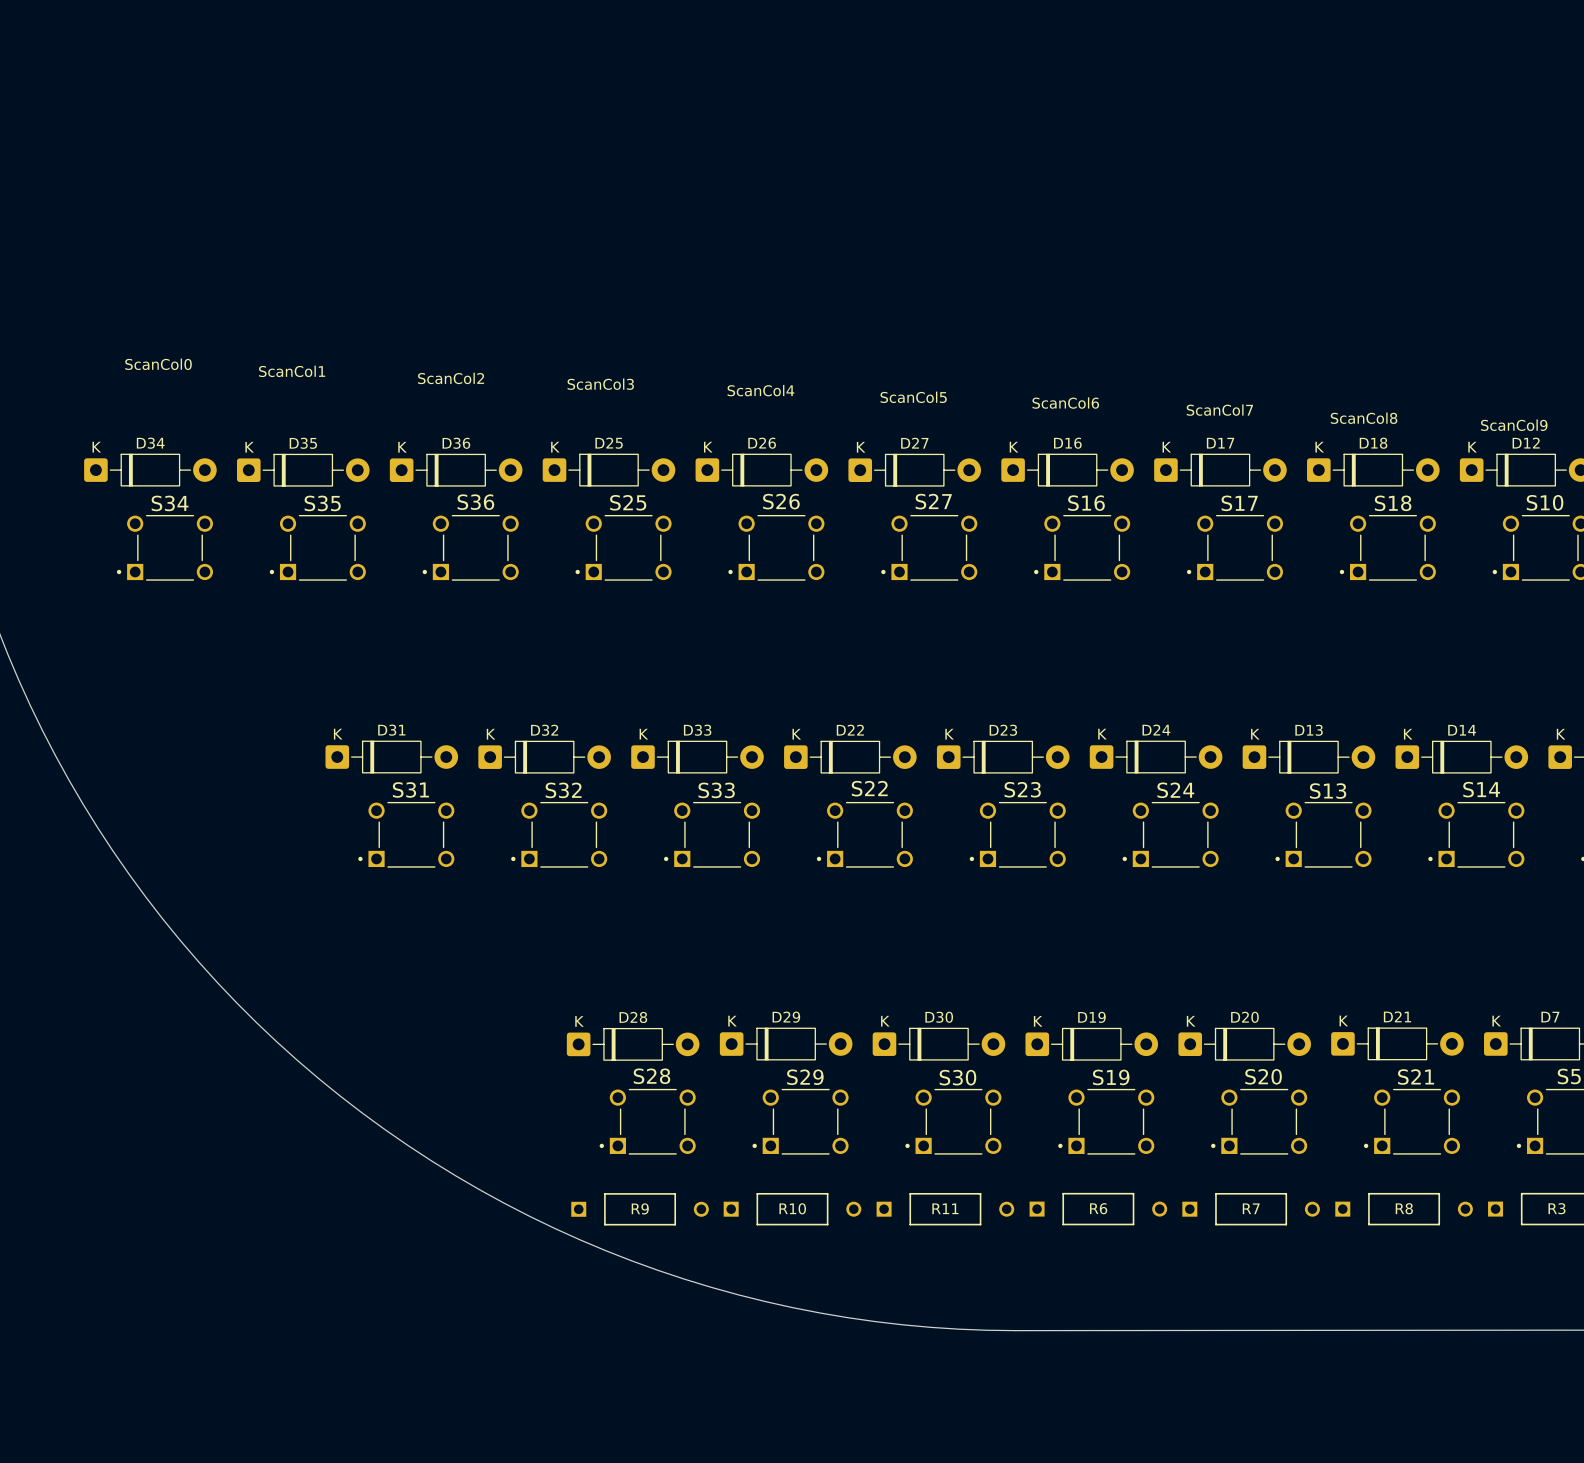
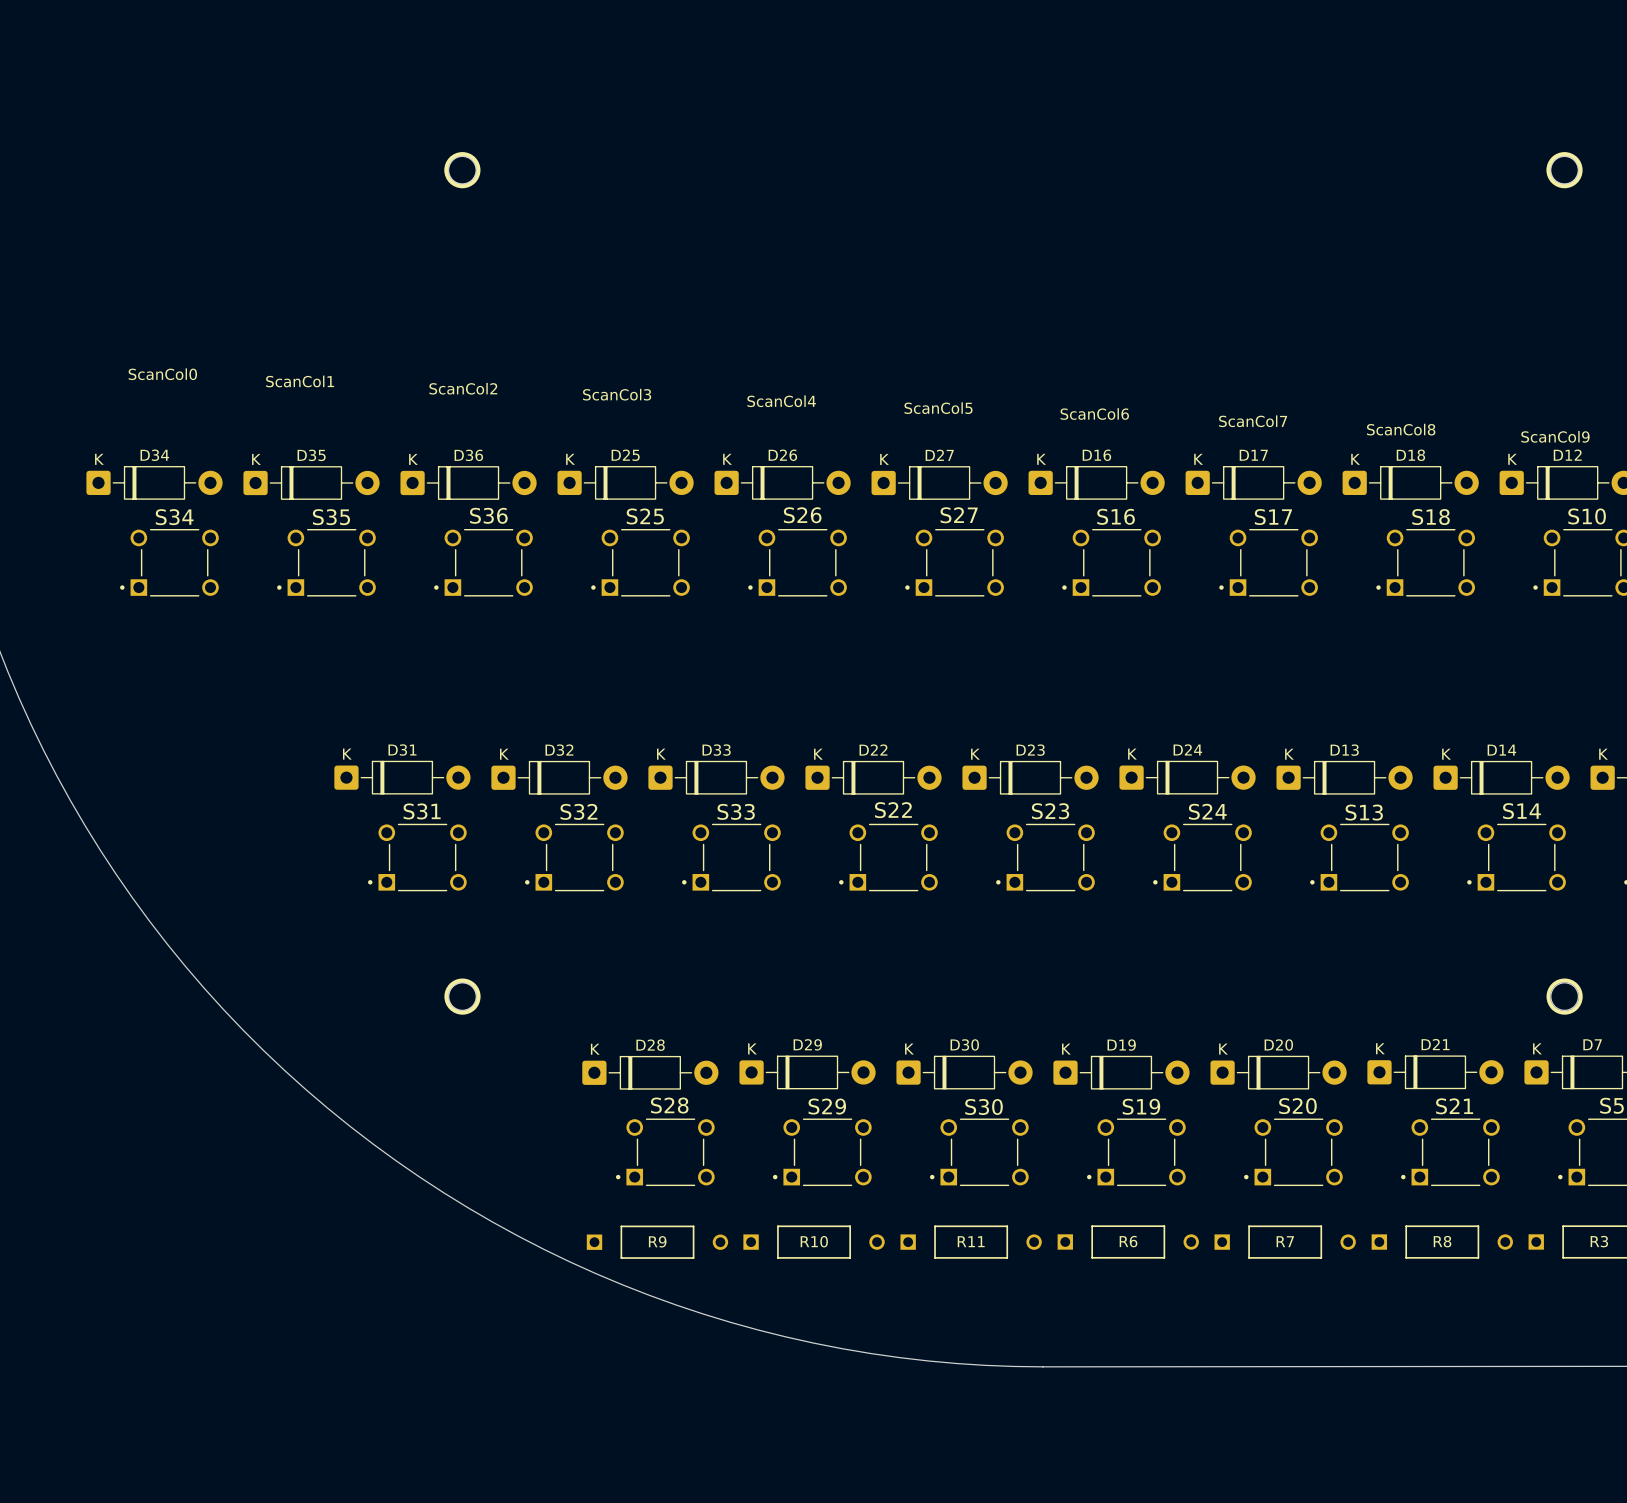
drawing: none -> [444, 152, 481, 189]
drawing: none -> [1546, 152, 1583, 189]
round board edge: none -> [448, 156, 477, 185]
round board edge: none -> [1550, 156, 1579, 185]
drawing: none -> [444, 978, 481, 1015]
drawing: none -> [1546, 978, 1583, 1015]
round board edge: none -> [448, 982, 477, 1011]
round board edge: none -> [1550, 982, 1579, 1011]

